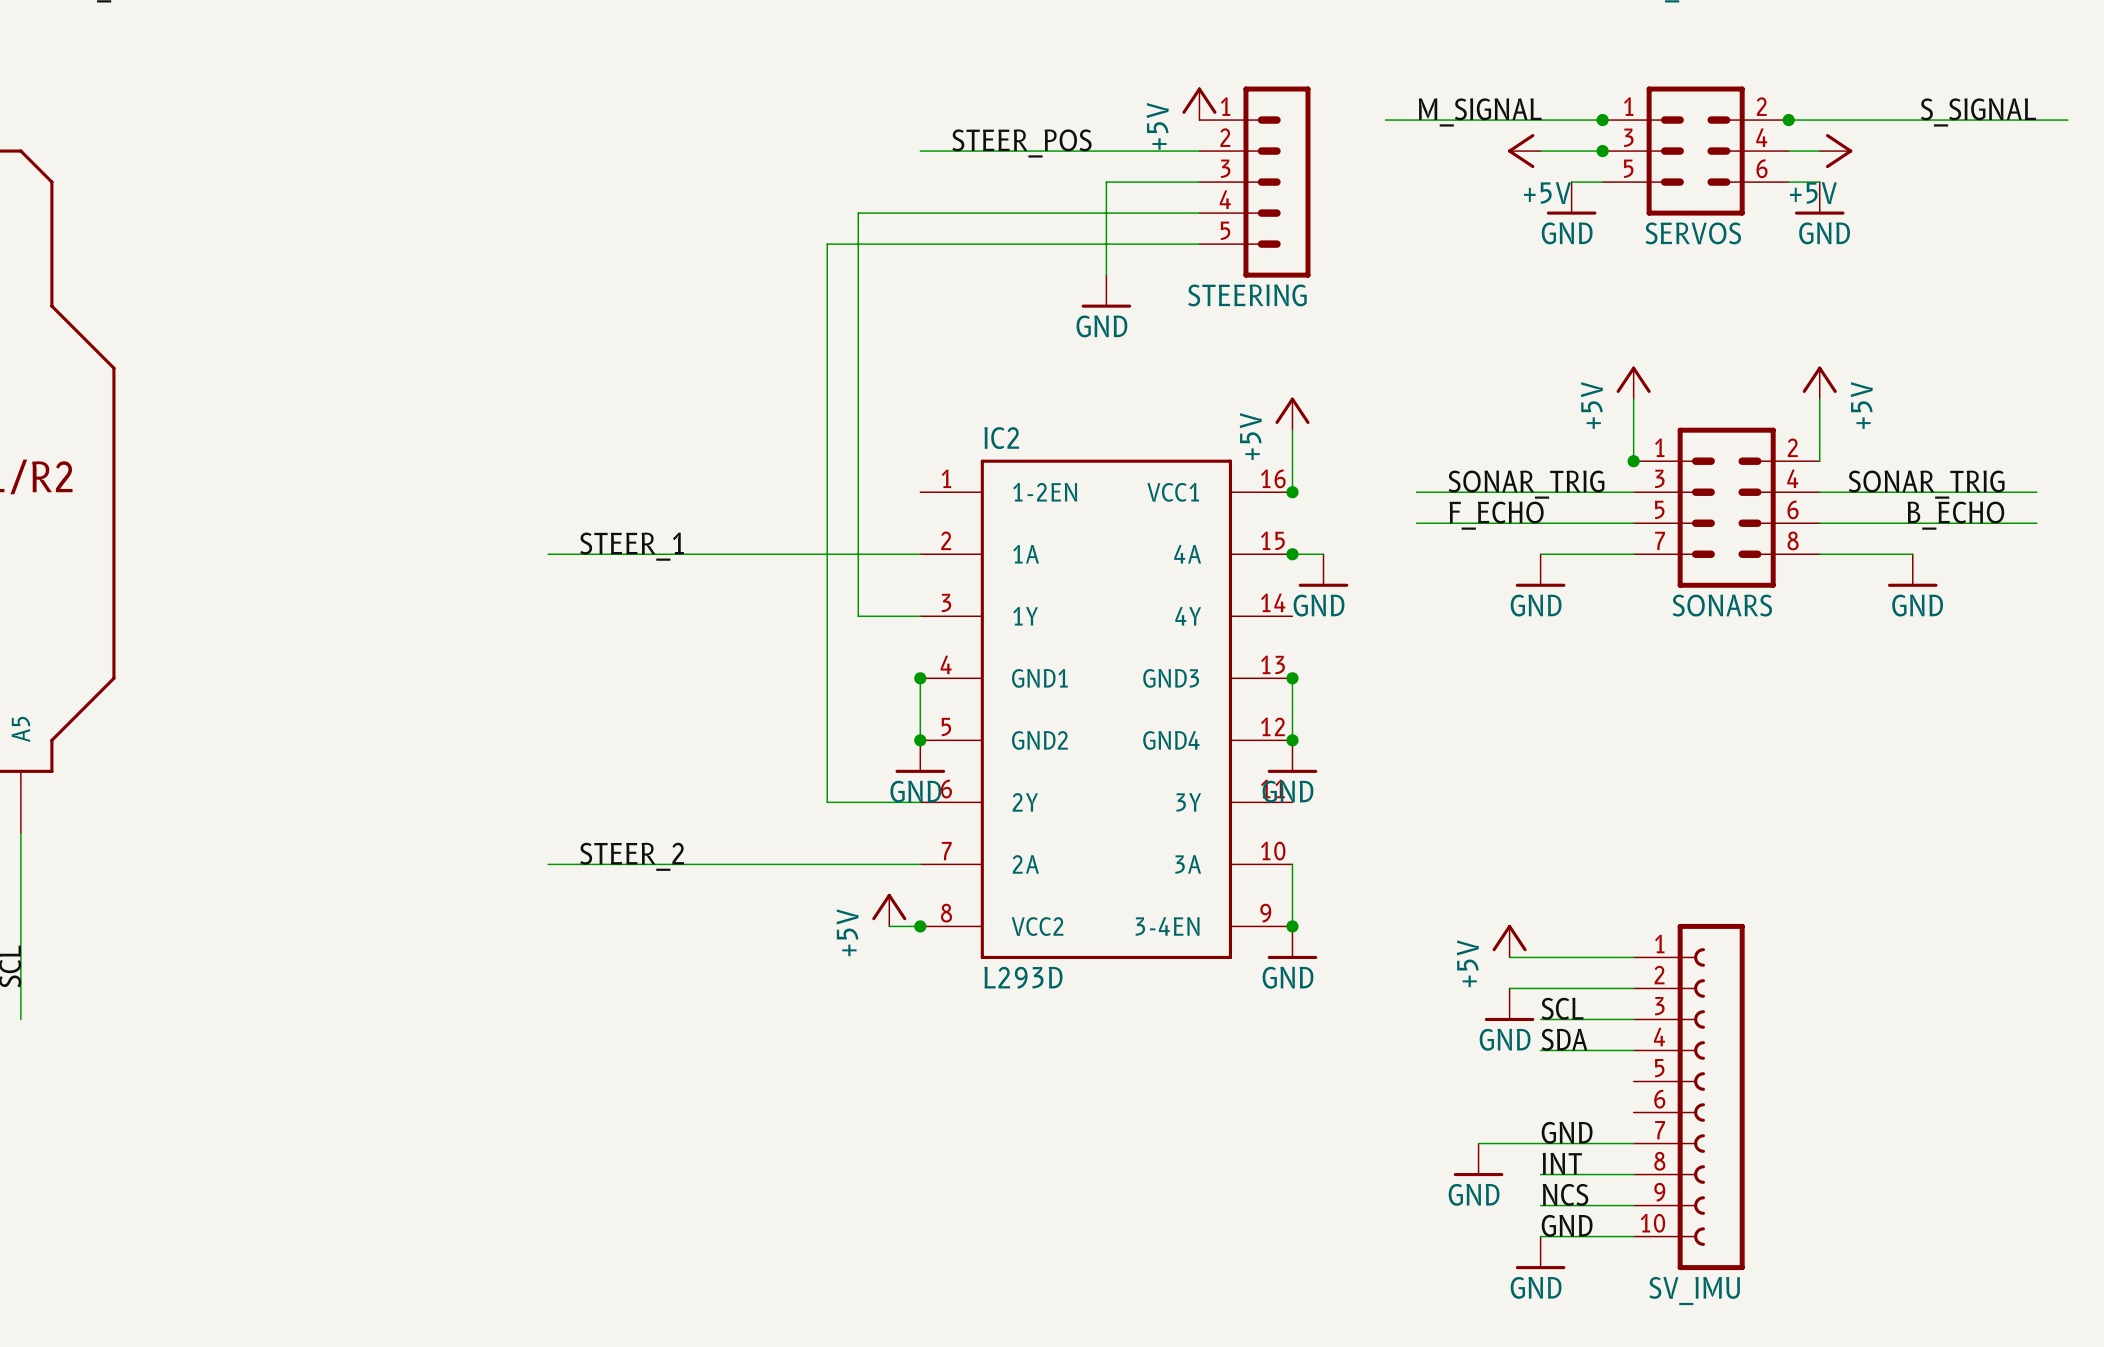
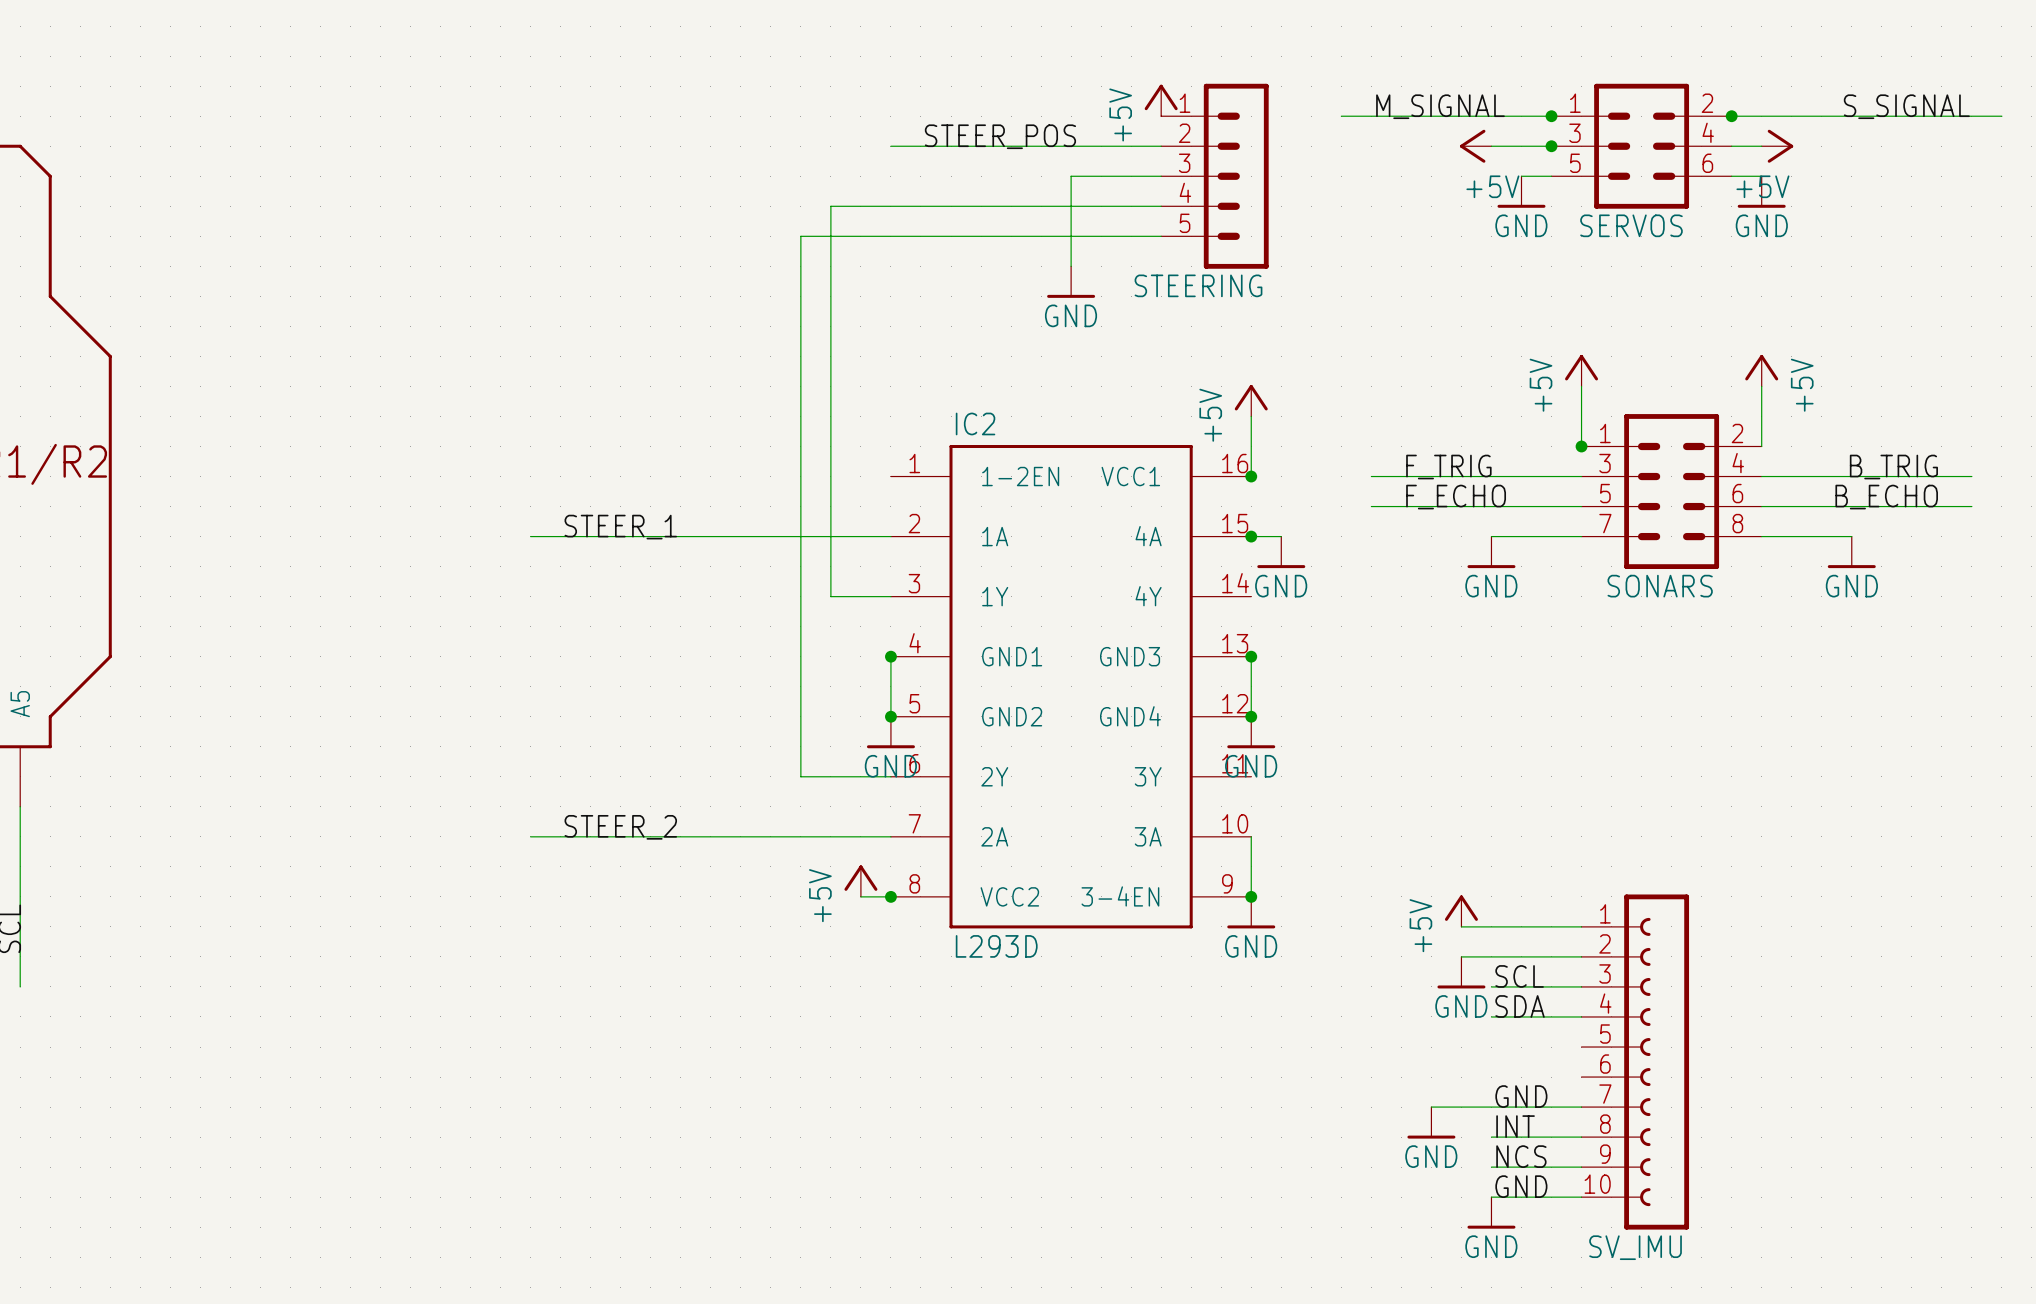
label: SONAR_TRIG (1526, 484) -> F_TRIG (1448, 467)
label: SONAR_TRIG (1926, 484) -> B_TRIG (1893, 467)

